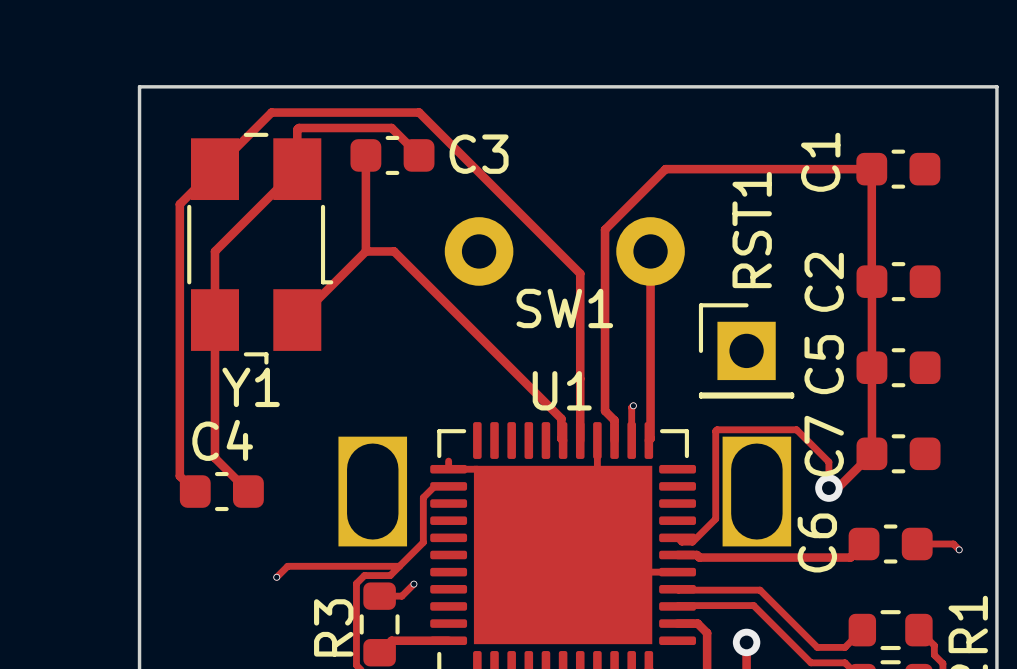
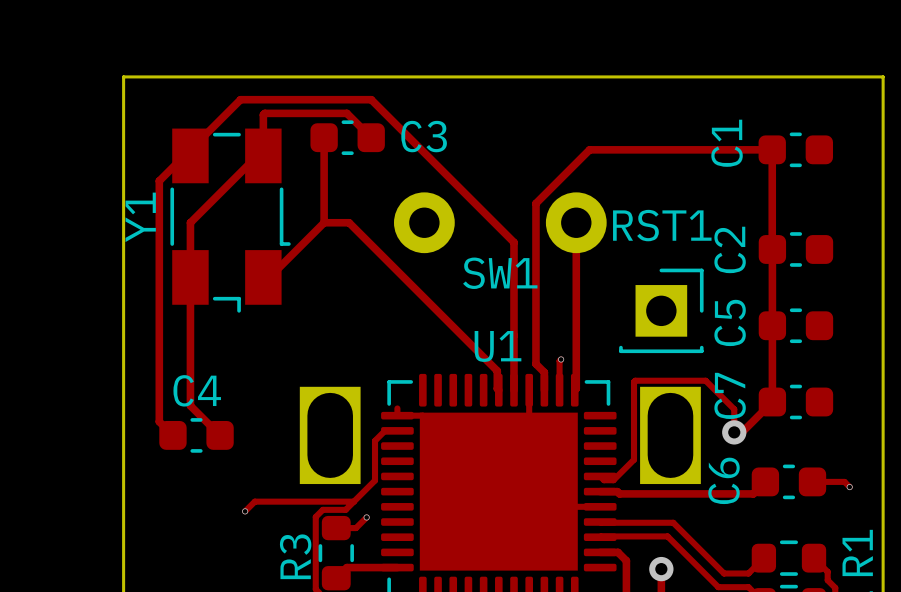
Y1 footprint: [187, 132, 334, 365] -> [170, 128, 291, 313]
RST1 footprint: [698, 303, 795, 399] -> [619, 268, 704, 354]
Y1 name rotation: 0° (251, 387) -> 90° counterclockwise (140, 217)
Y1 name position: Y1 (251, 387) -> Y1 (140, 217)

